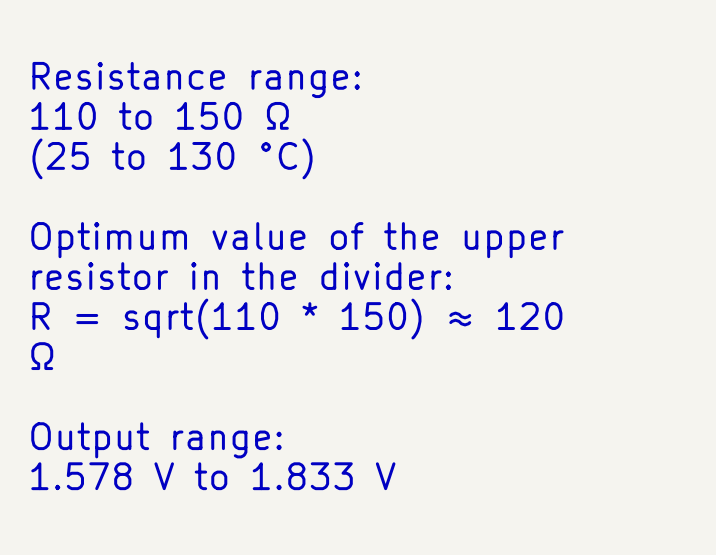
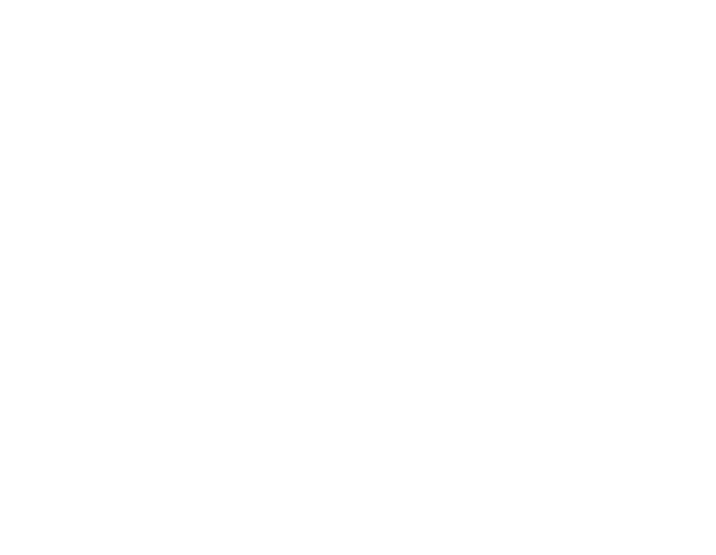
text: Resistance range: (196, 79) -> none
text: 110 to 150 Ω (160, 115) -> none
text: (25 to 130 °C) (172, 158) -> none
text: Optimum value of the upper (297, 240) -> none
text: resistor in the divider: (241, 276) -> none
text: R = sqrt(110 * 150) ≈ 120 (297, 319) -> none
text: Ω (42, 356) -> none
text: Output range: (156, 440) -> none
text: 1.578 V to 1.833 V (213, 476) -> none

